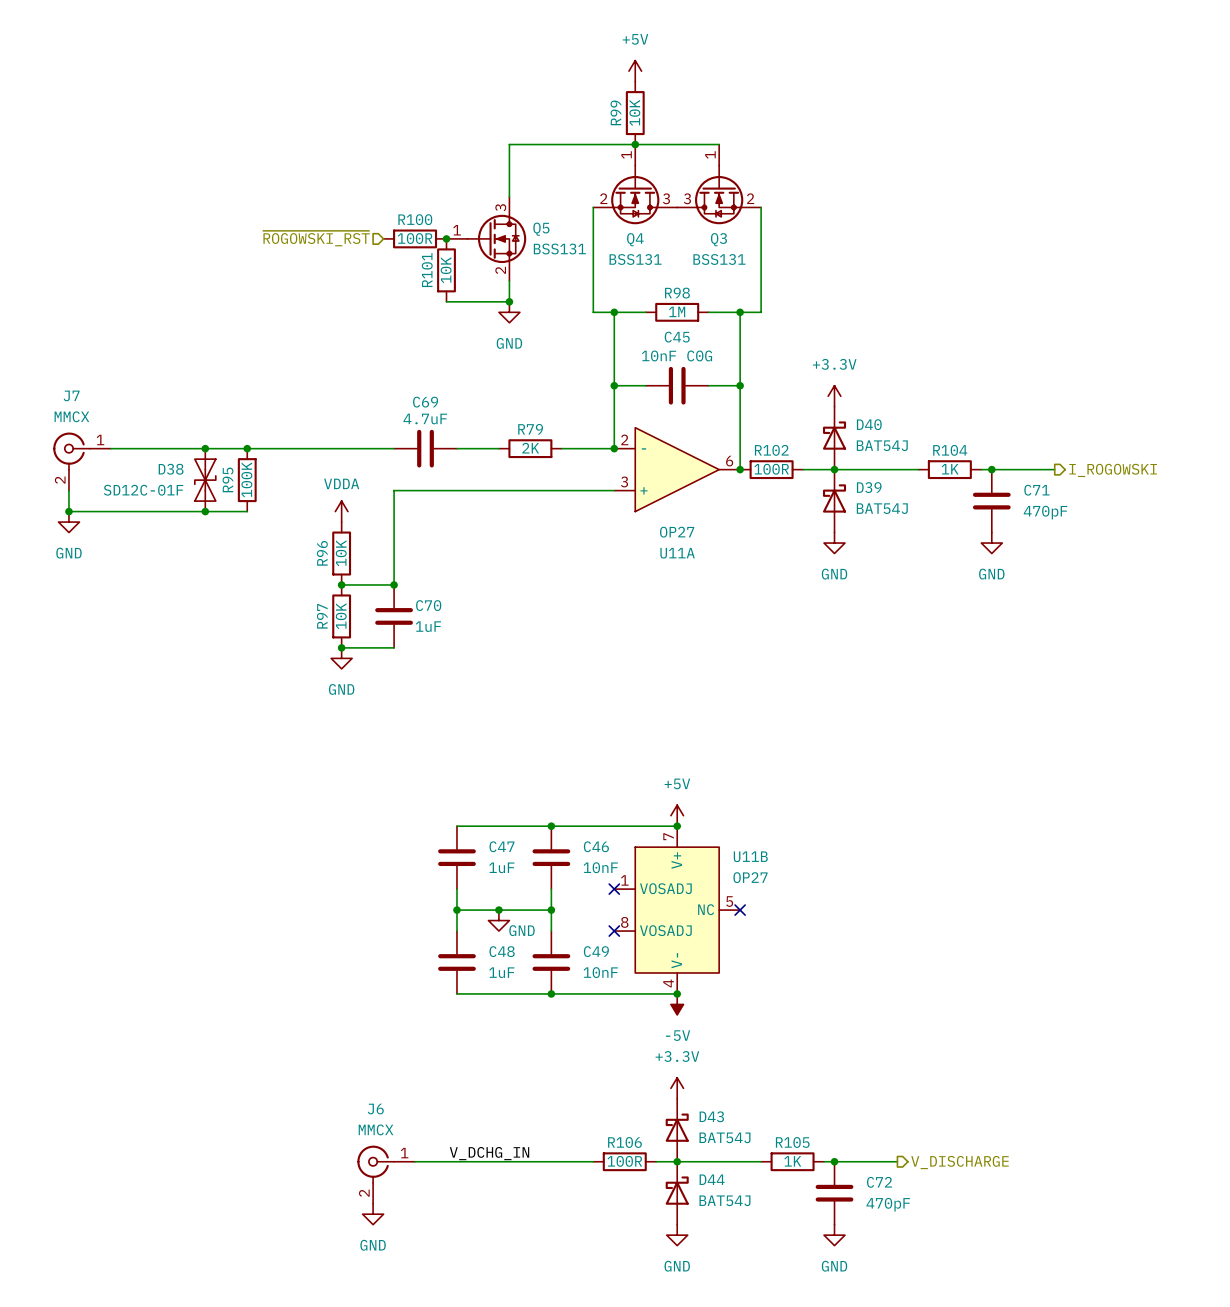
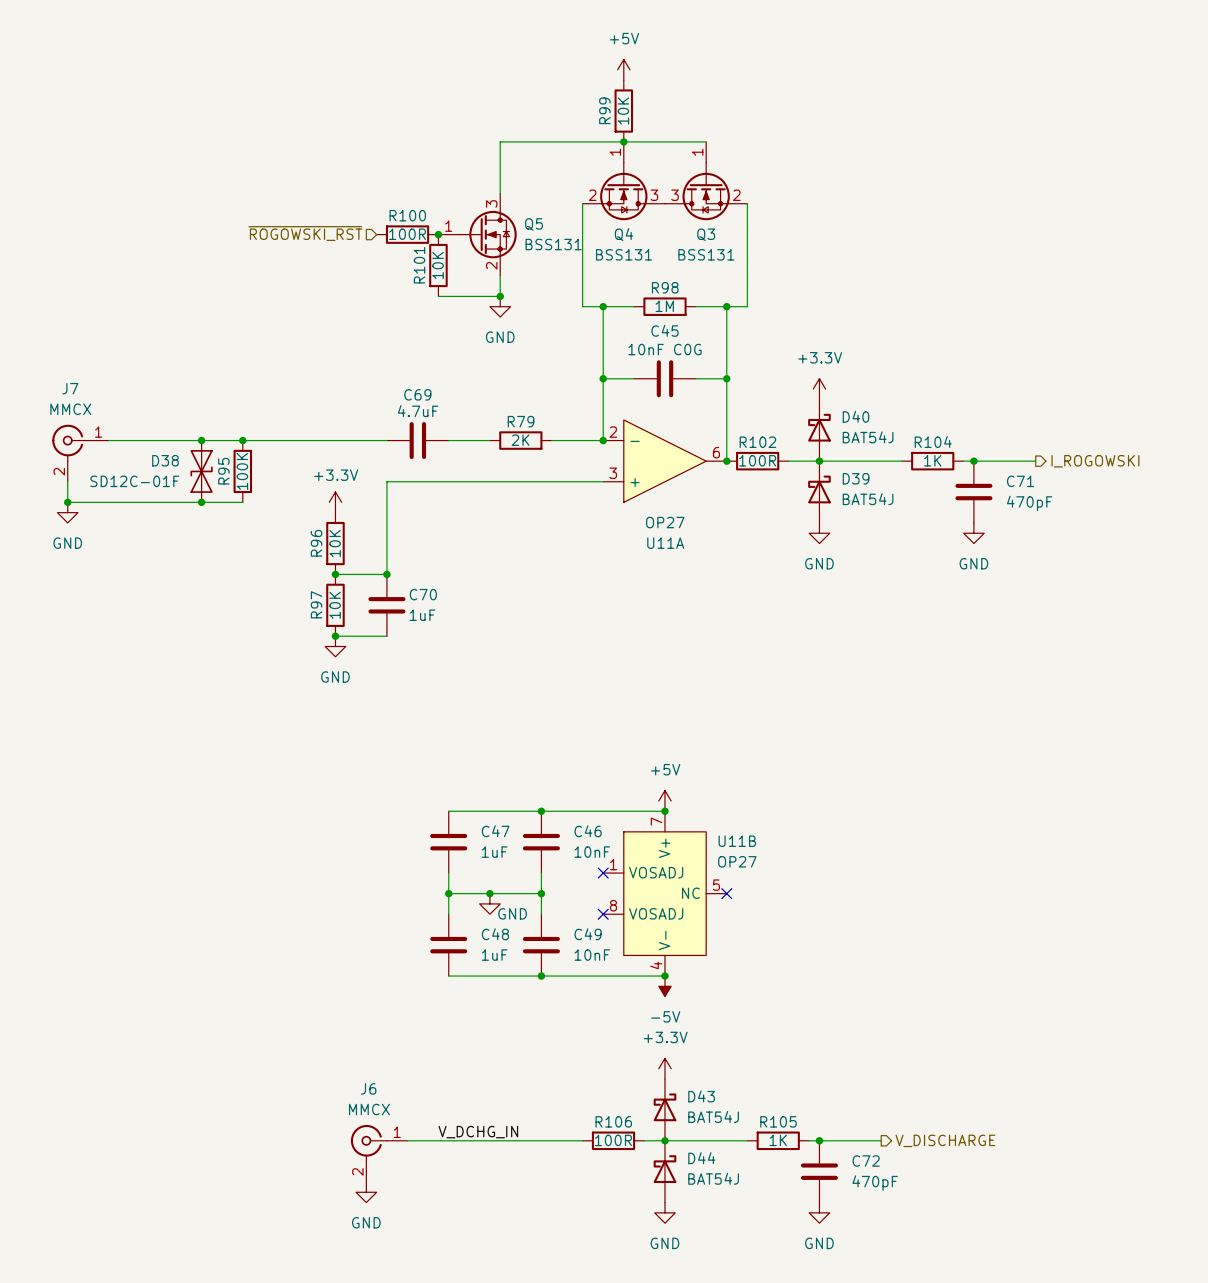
power symbol: VDDA (341, 511) -> +3.3V (335, 502)

